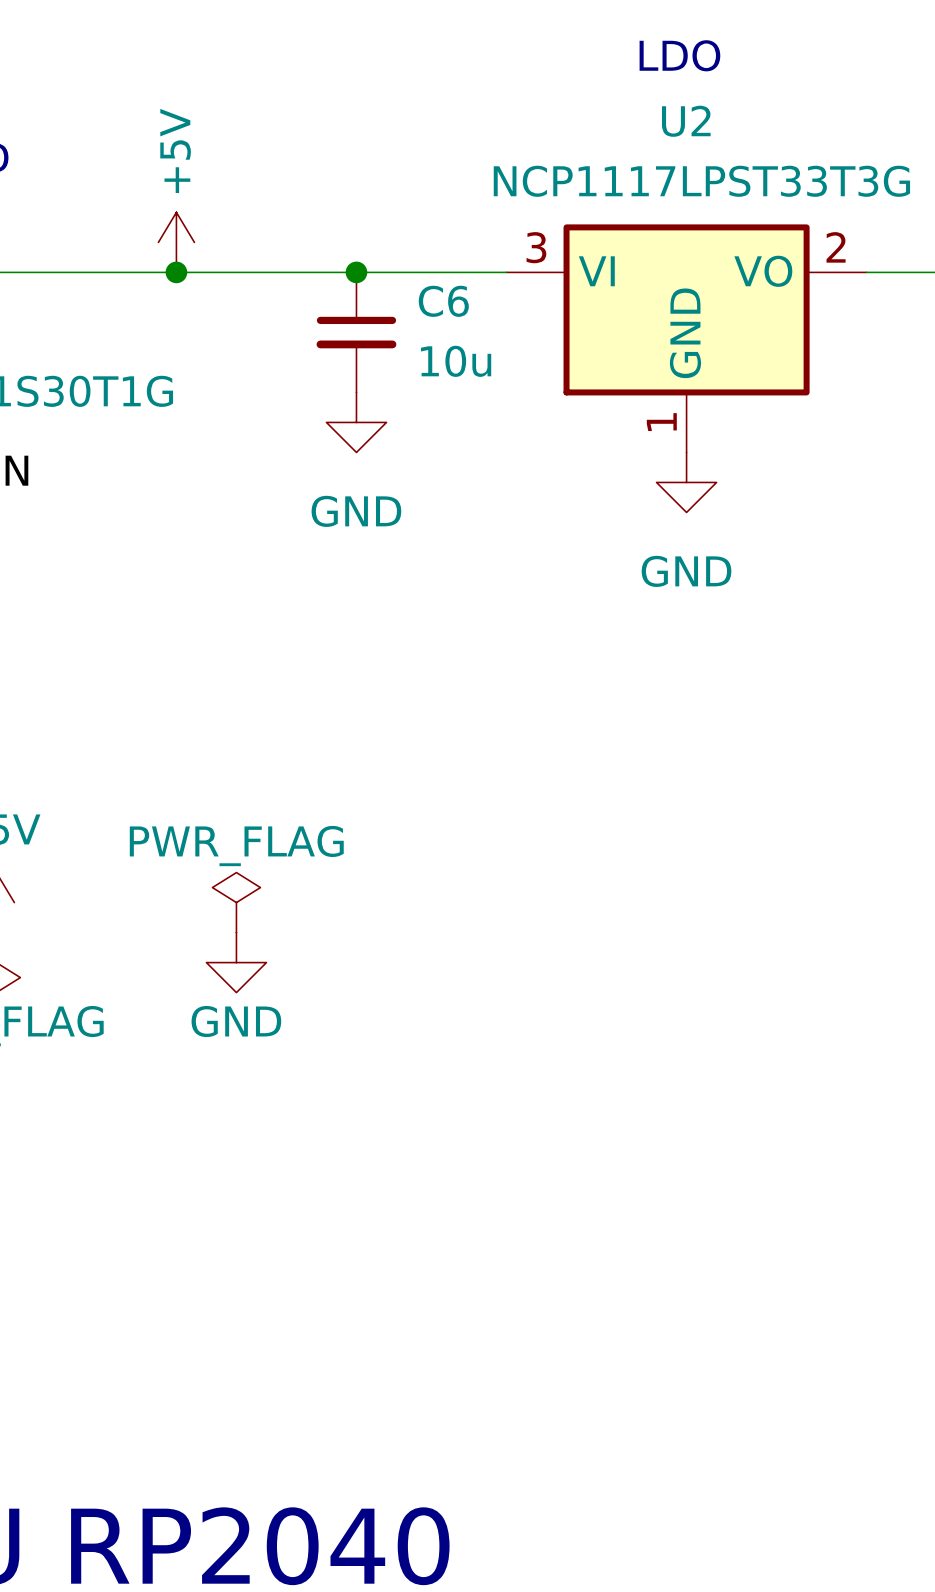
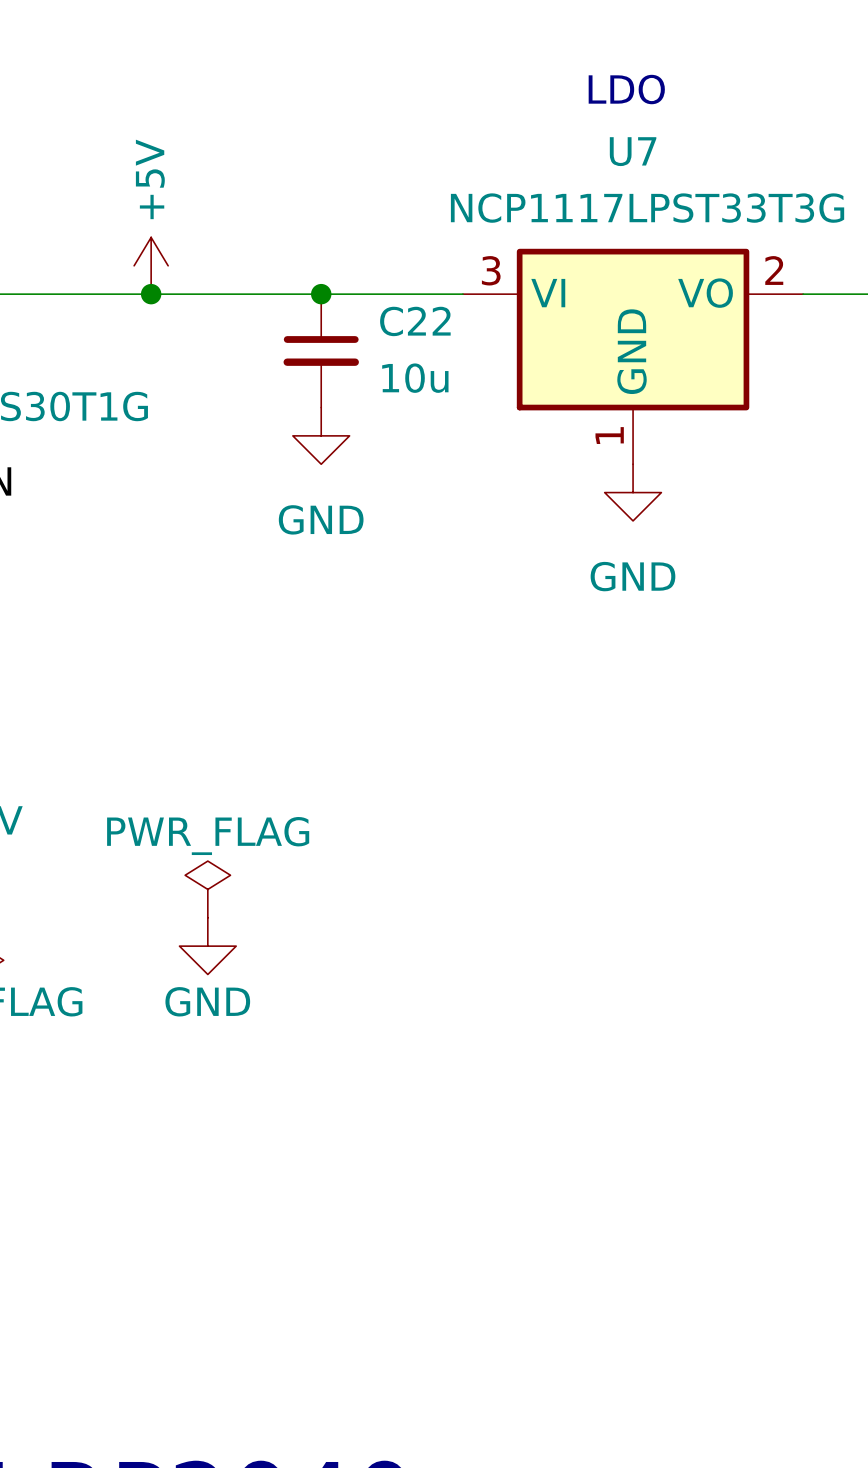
U2 name: U2 (686, 121) -> U7 (633, 151)
C6 name: C6 (443, 301) -> C22 (415, 321)

